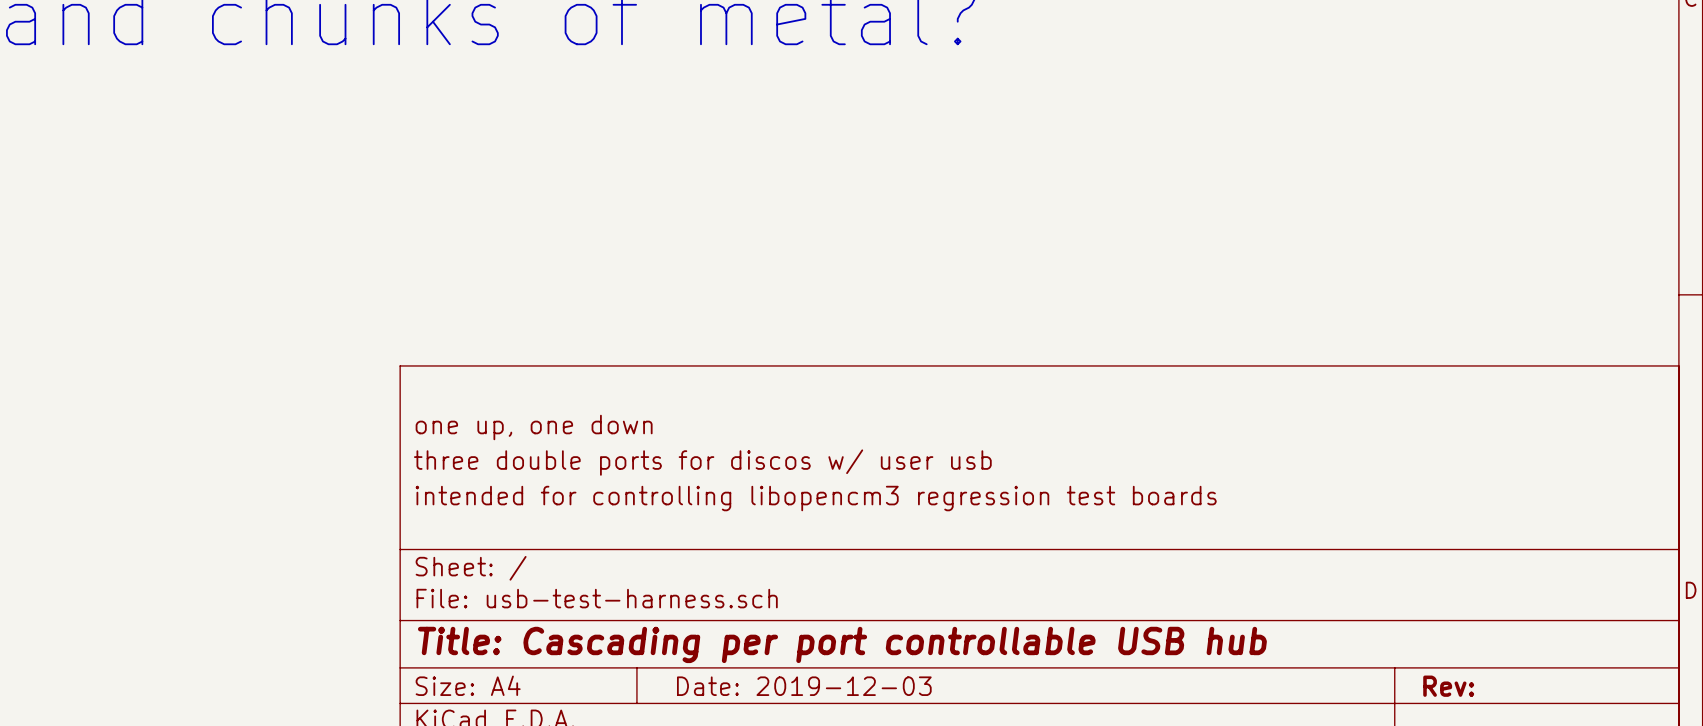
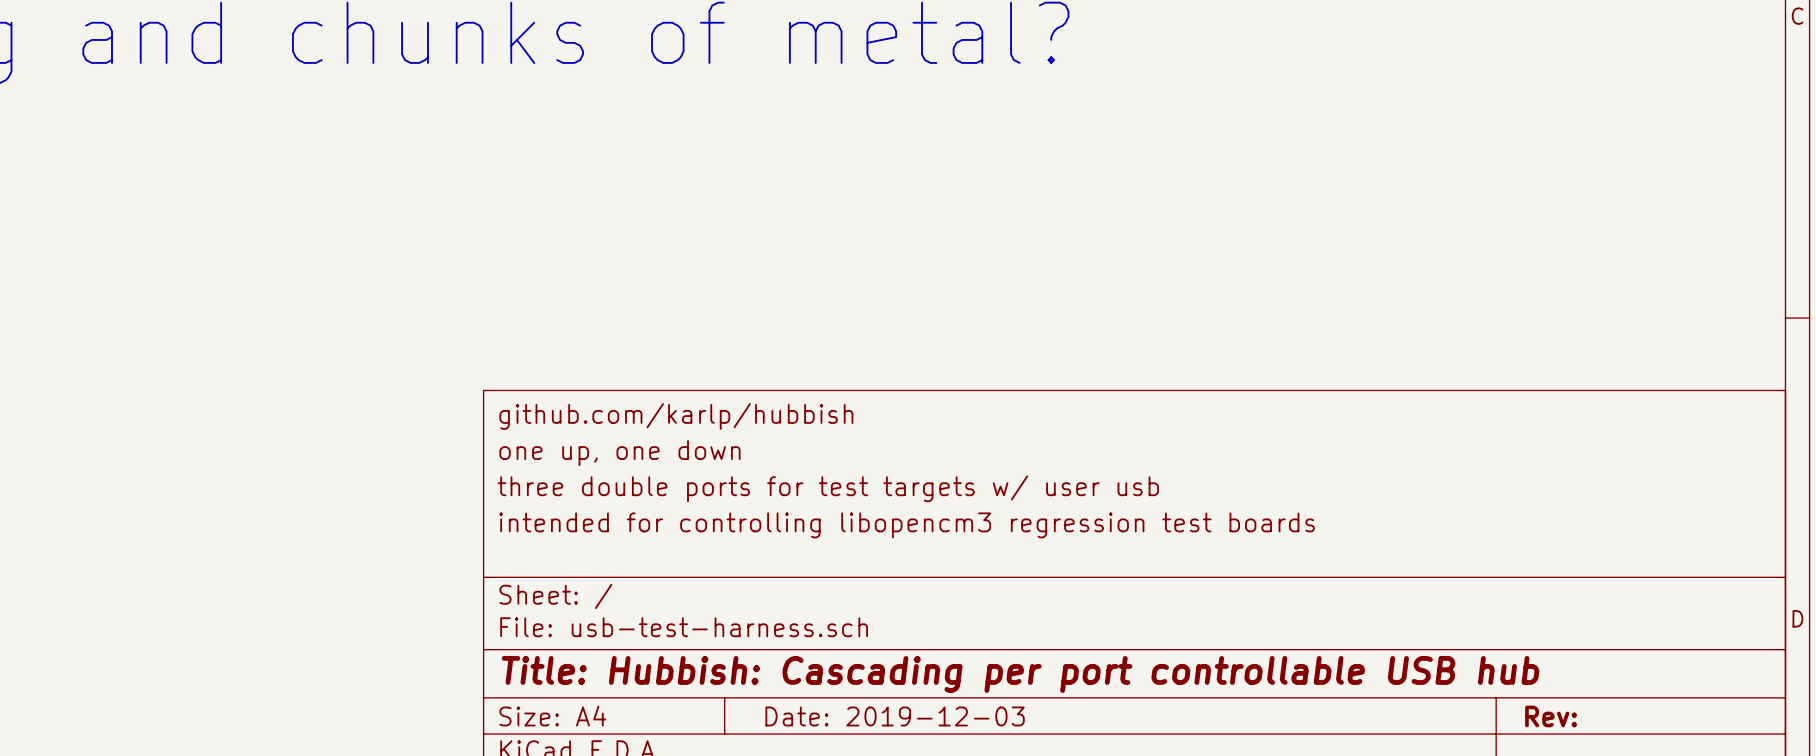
title block: none -> github.com/karlp/hubbish (676, 416)
title block: three double ports for discos w/ user usb (702, 462) -> three double ports for test targets w/ user usb (828, 488)
title block: Title: Cascading per port controllable USB hub (842, 644) -> Title: Hubbish: Cascading per port controllable USB hub (1020, 674)

